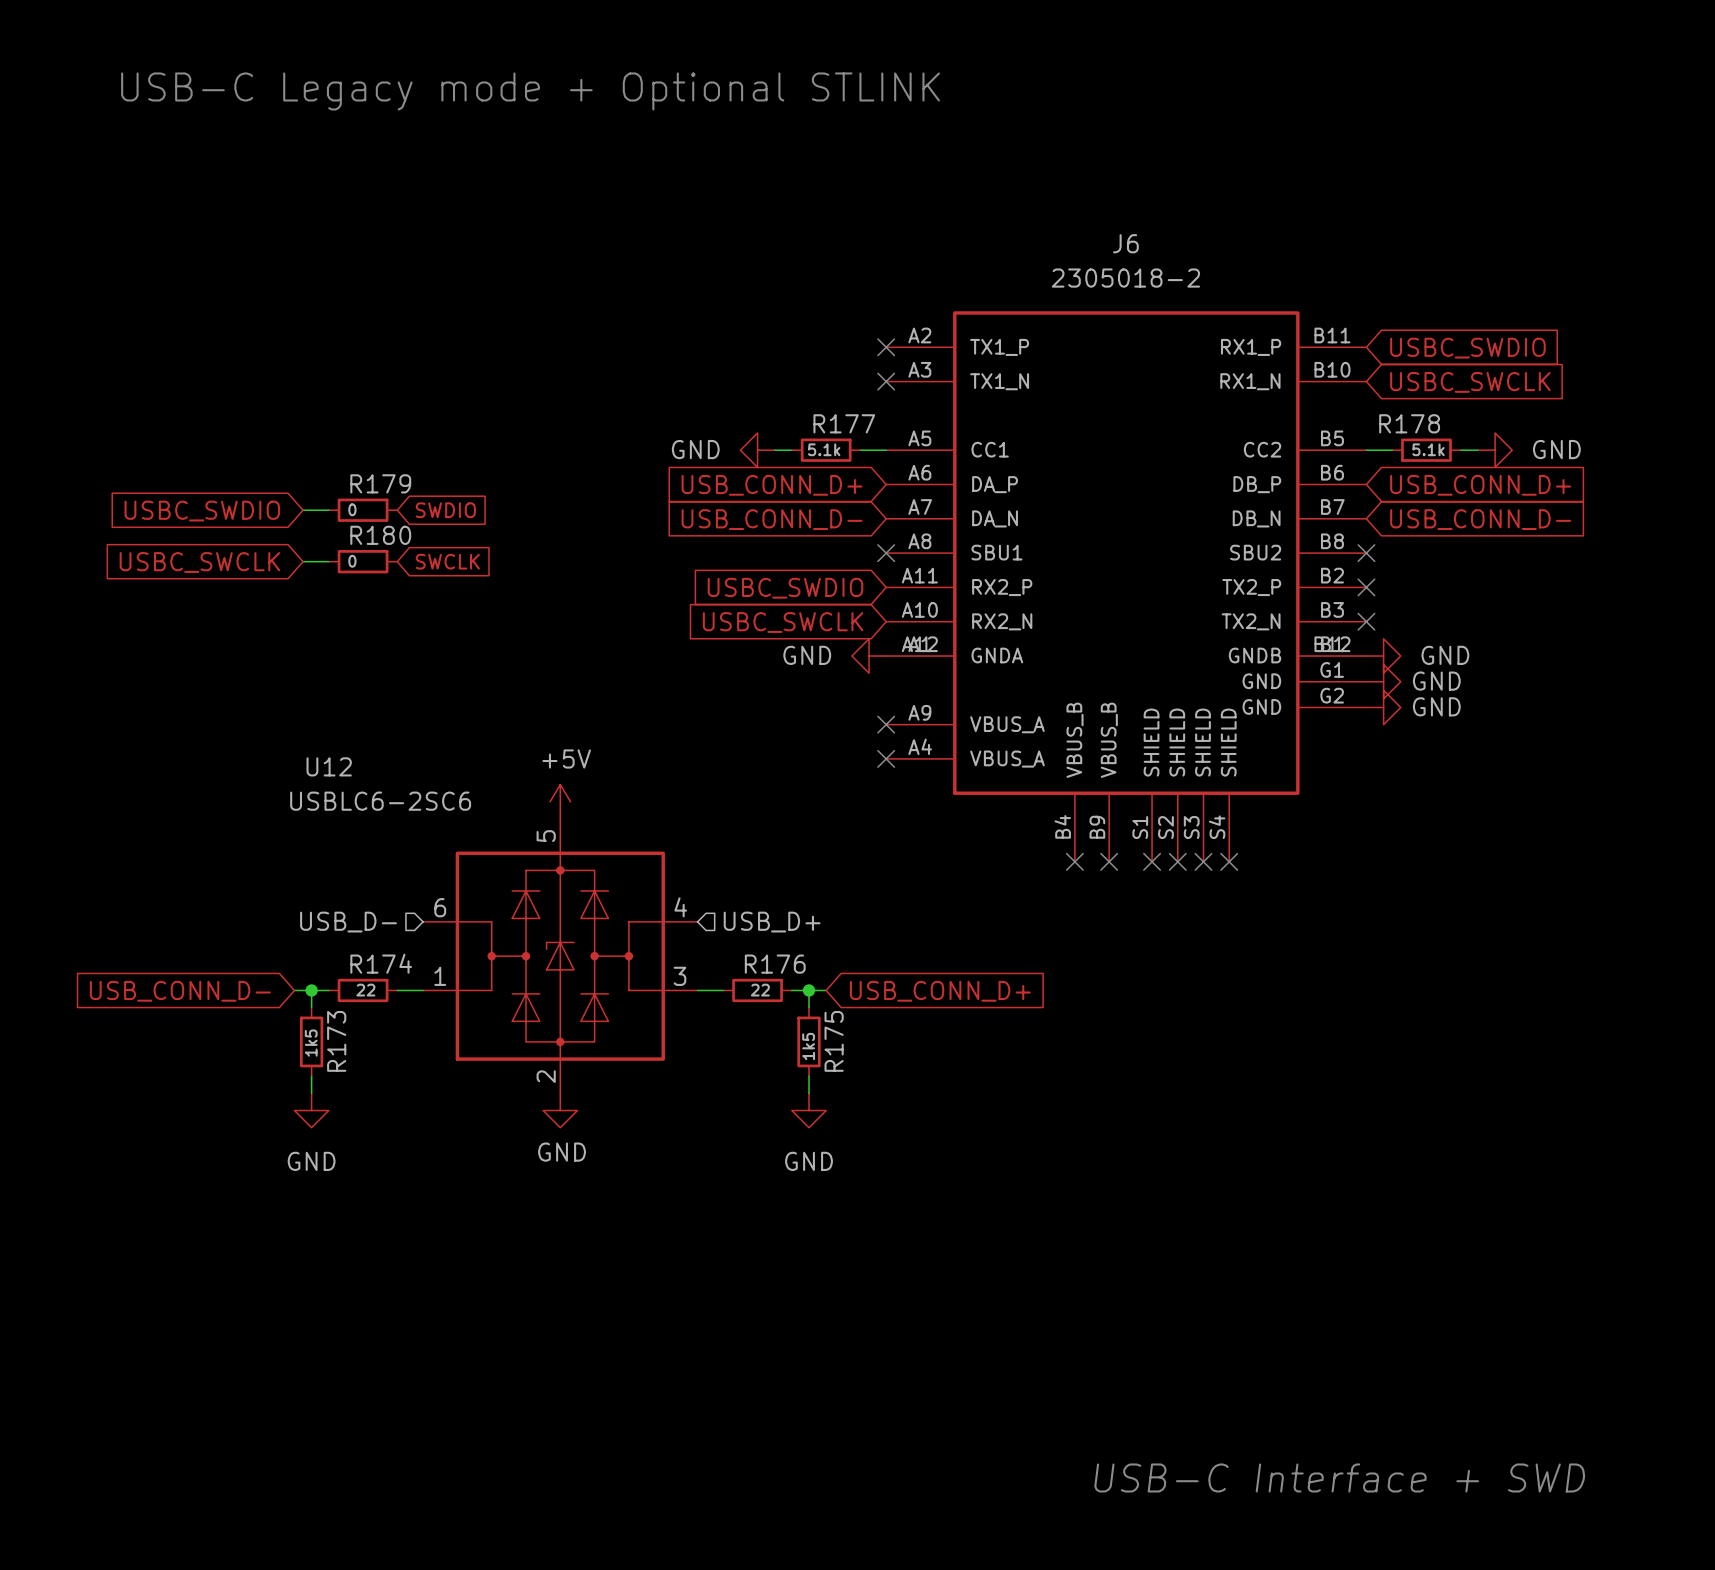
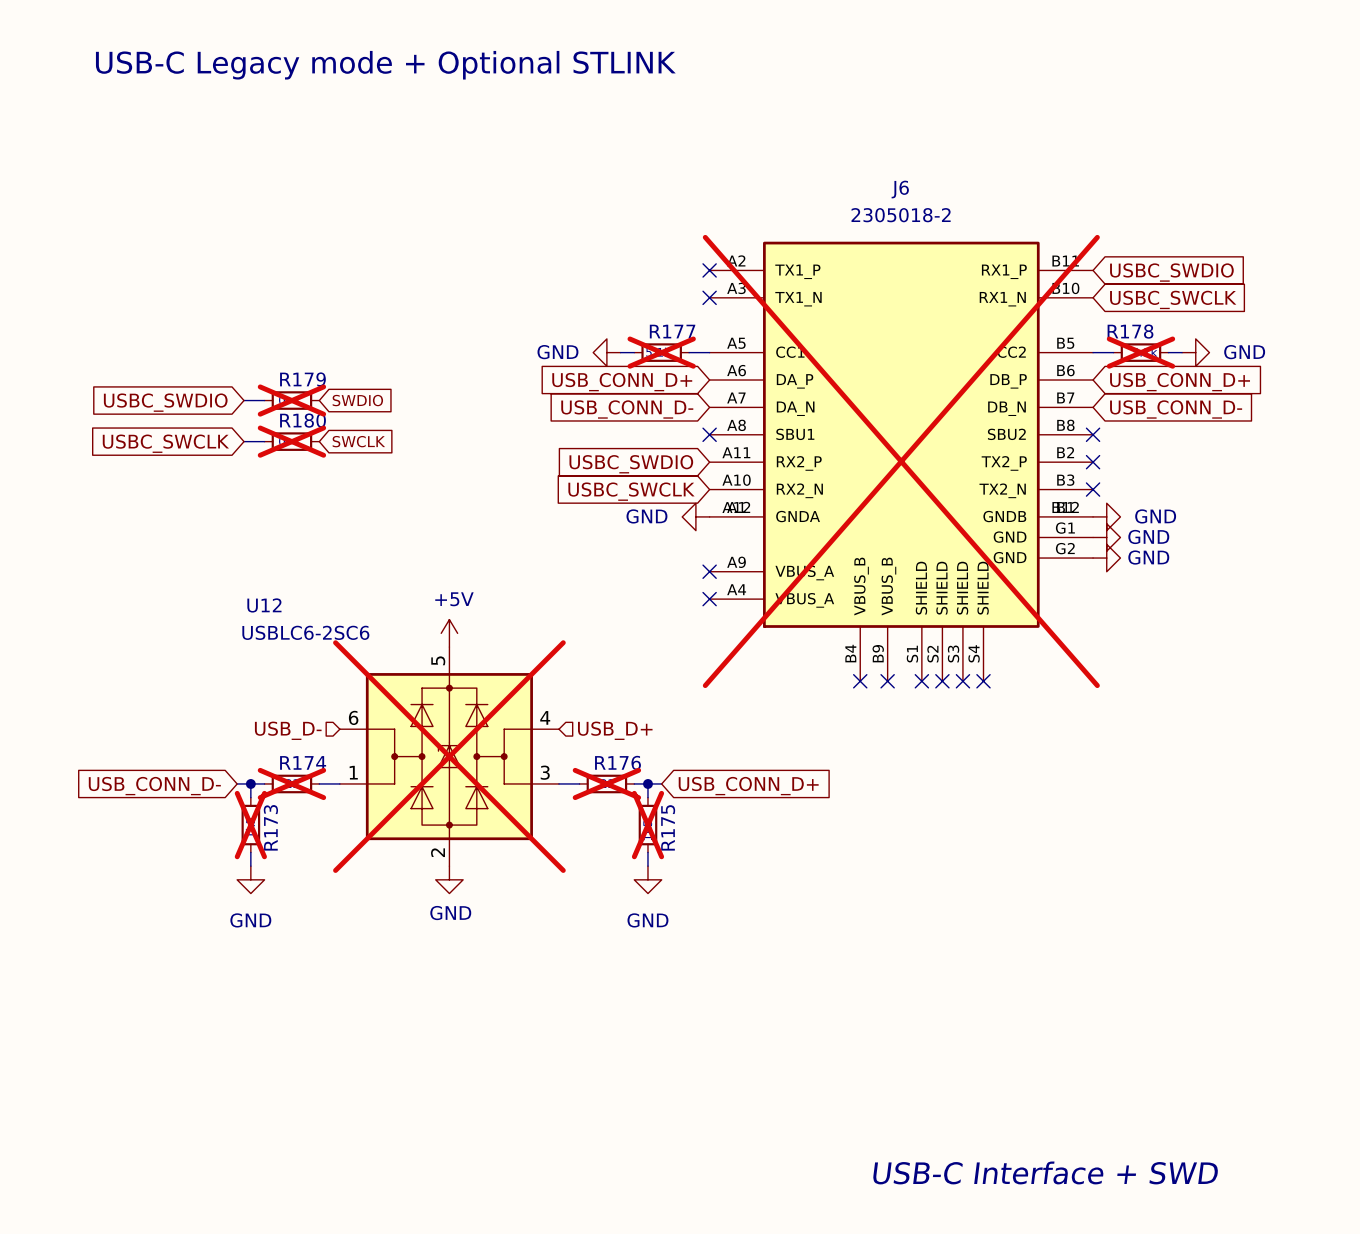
R177 do-not-place cross: none -> (661, 352)
R178 do-not-place cross: none -> (1140, 352)
R179 do-not-place cross: none -> (291, 400)
R180 do-not-place cross: none -> (291, 441)
J6 do-not-place cross: none -> (901, 461)
U12 do-not-place cross: none -> (449, 756)
R174 do-not-place cross: none -> (291, 783)
R176 do-not-place cross: none -> (606, 783)
R173 do-not-place cross: none -> (250, 825)
R175 do-not-place cross: none -> (647, 825)

